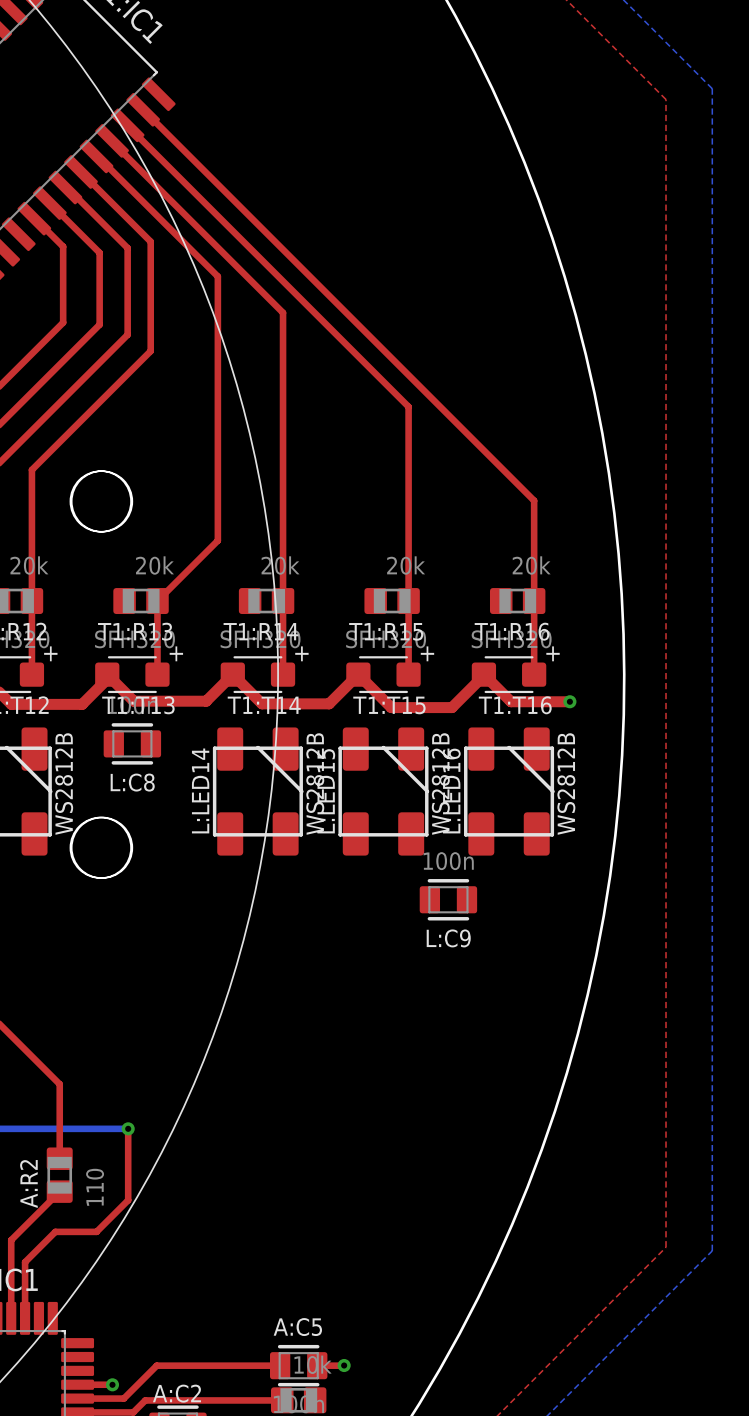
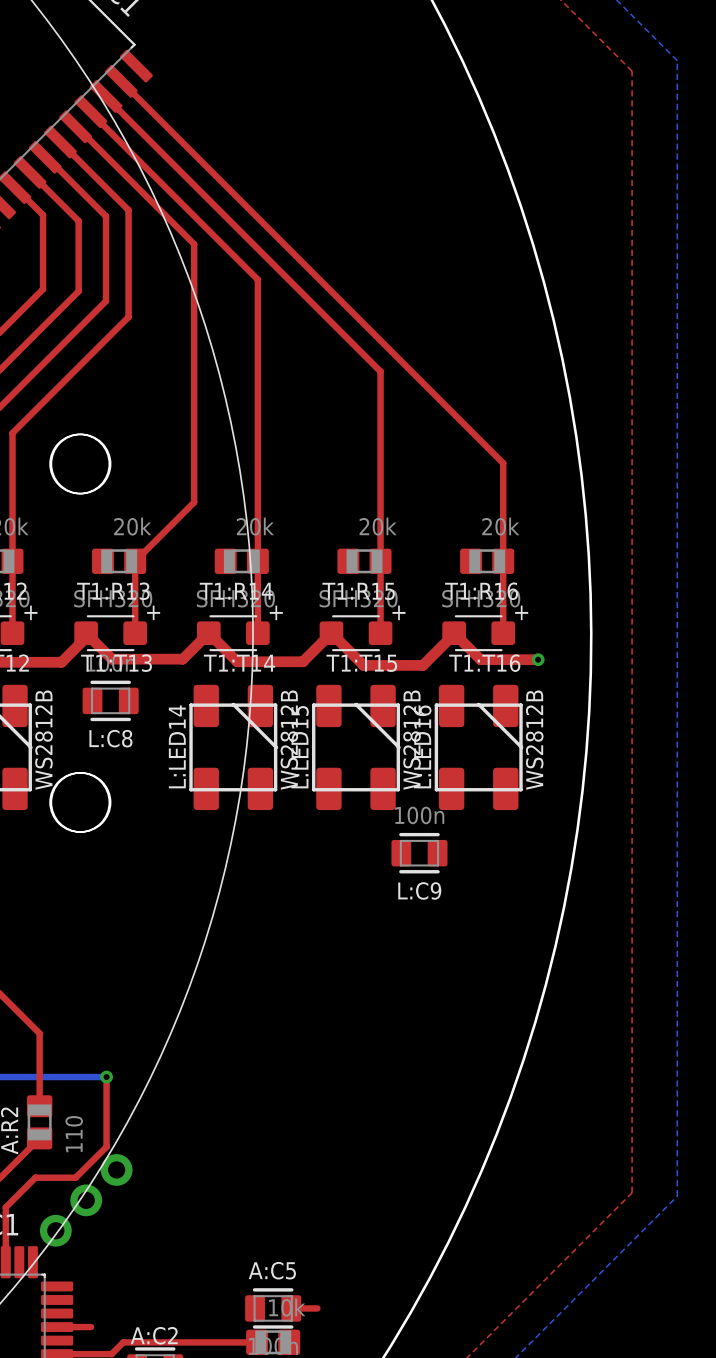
part: none -> (86, 1200)
top track: (283, 1357) (280, 1365) (156, 1365) (123, 1398) (77, 1398) -> none
via: (344, 1365) -> none
via: (112, 1384) -> none

